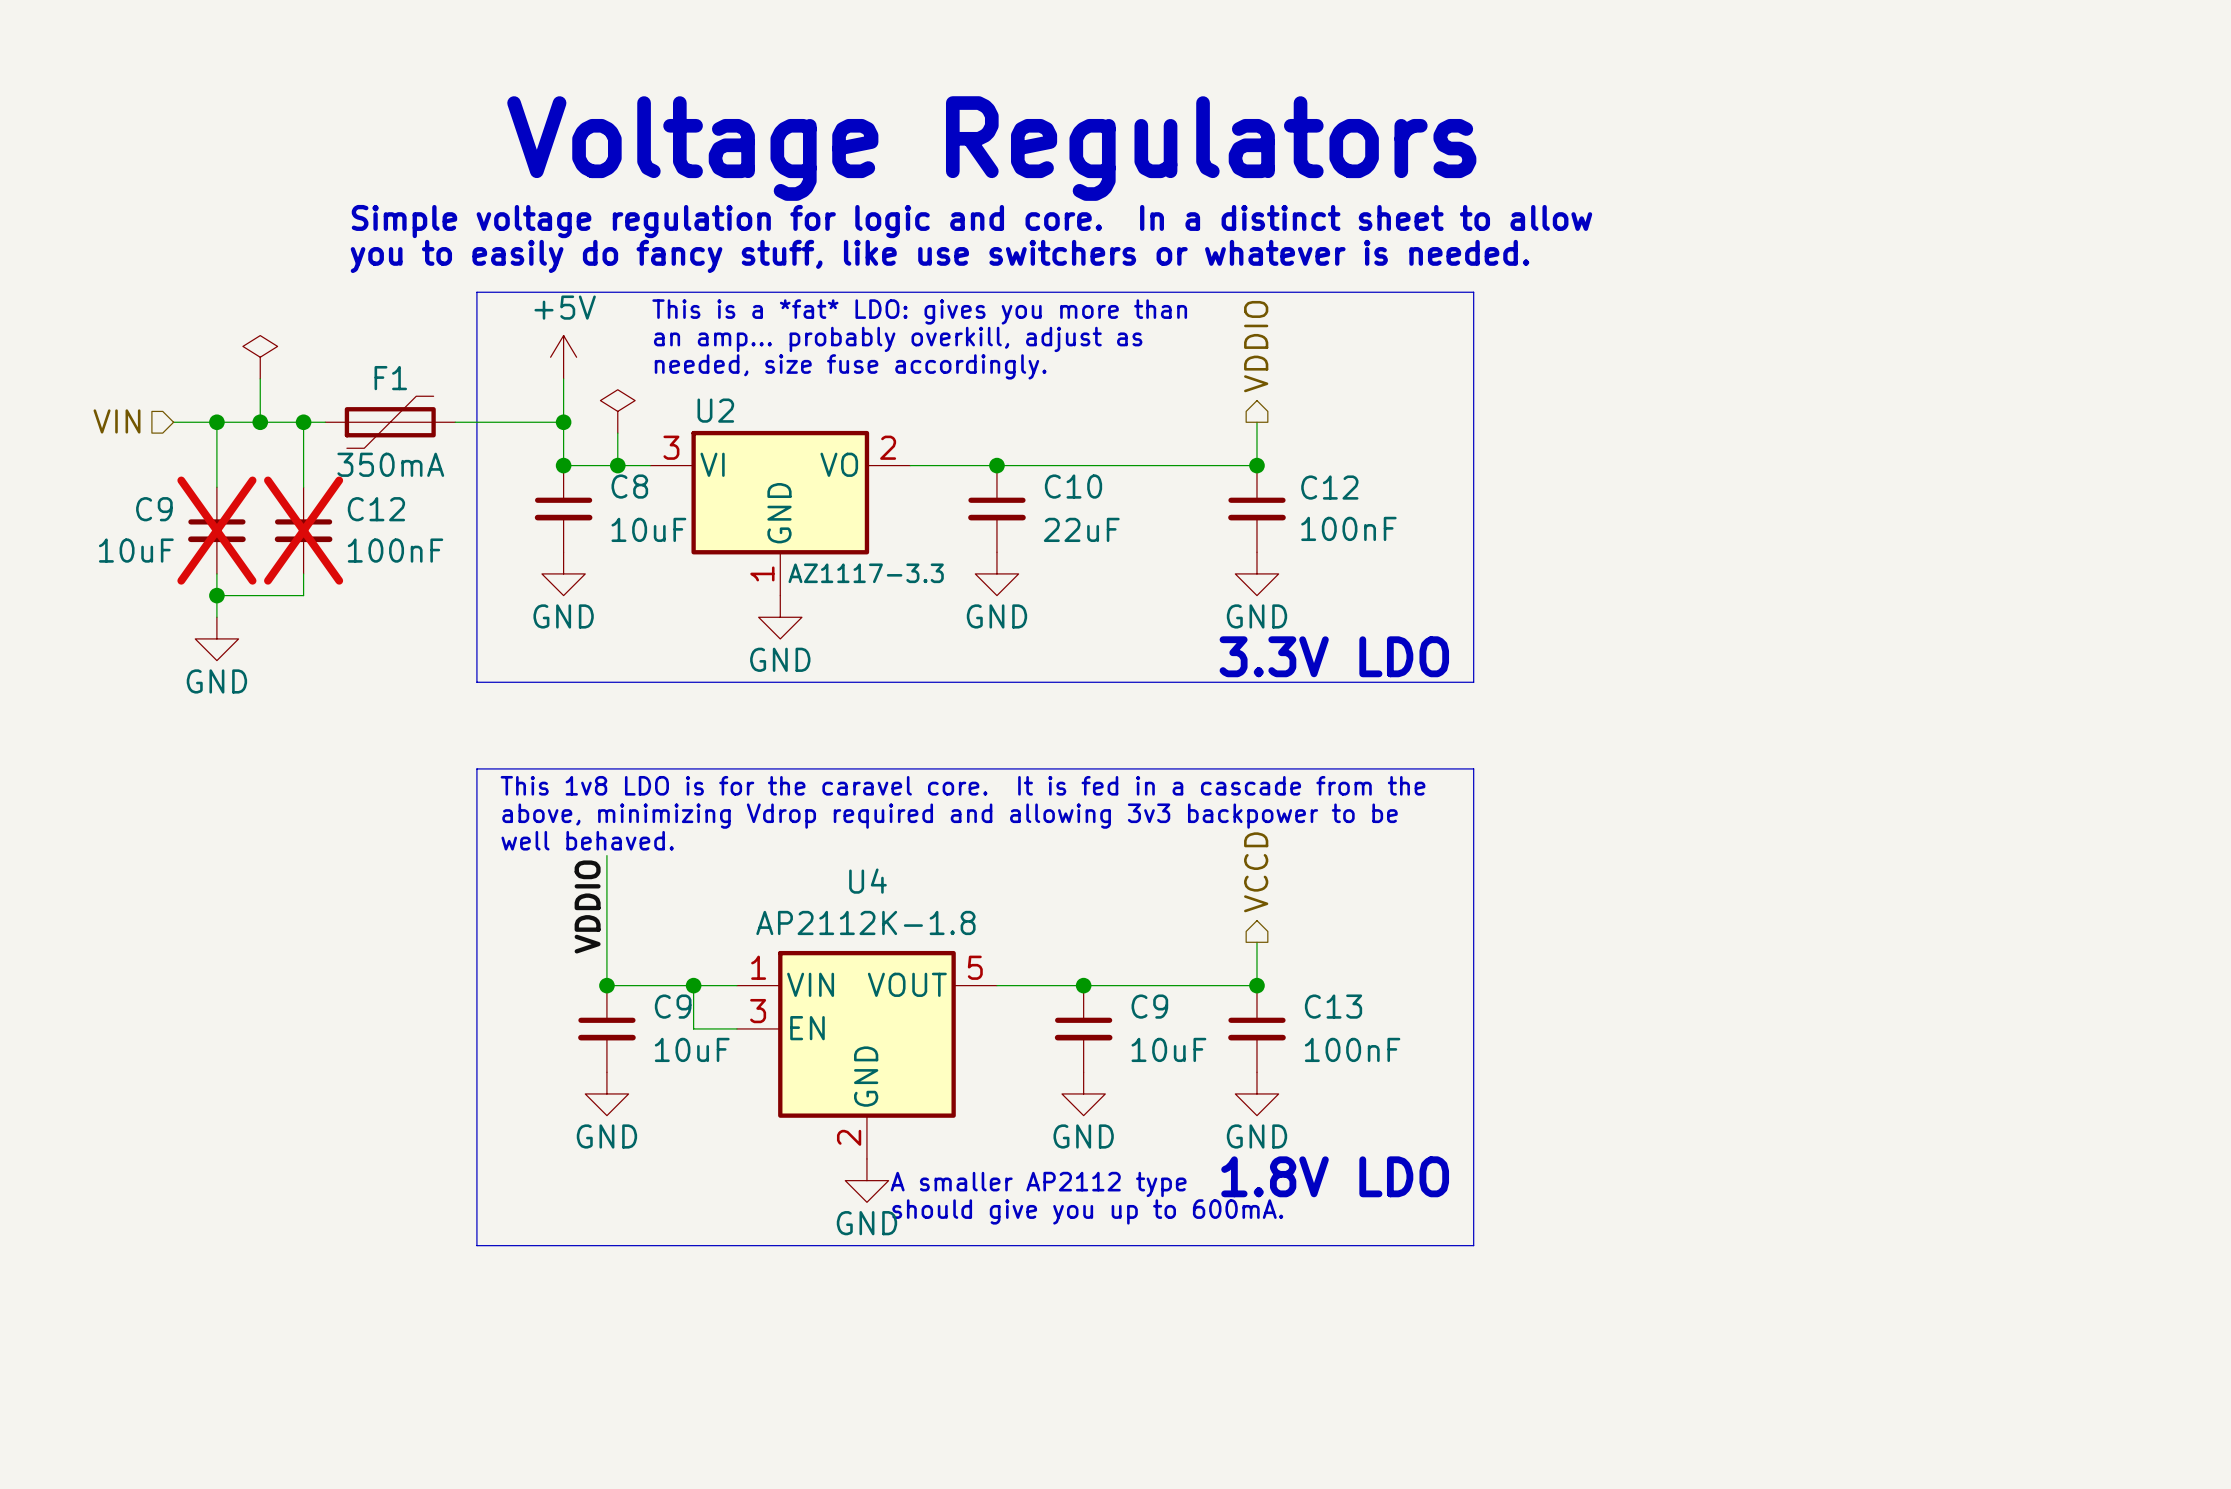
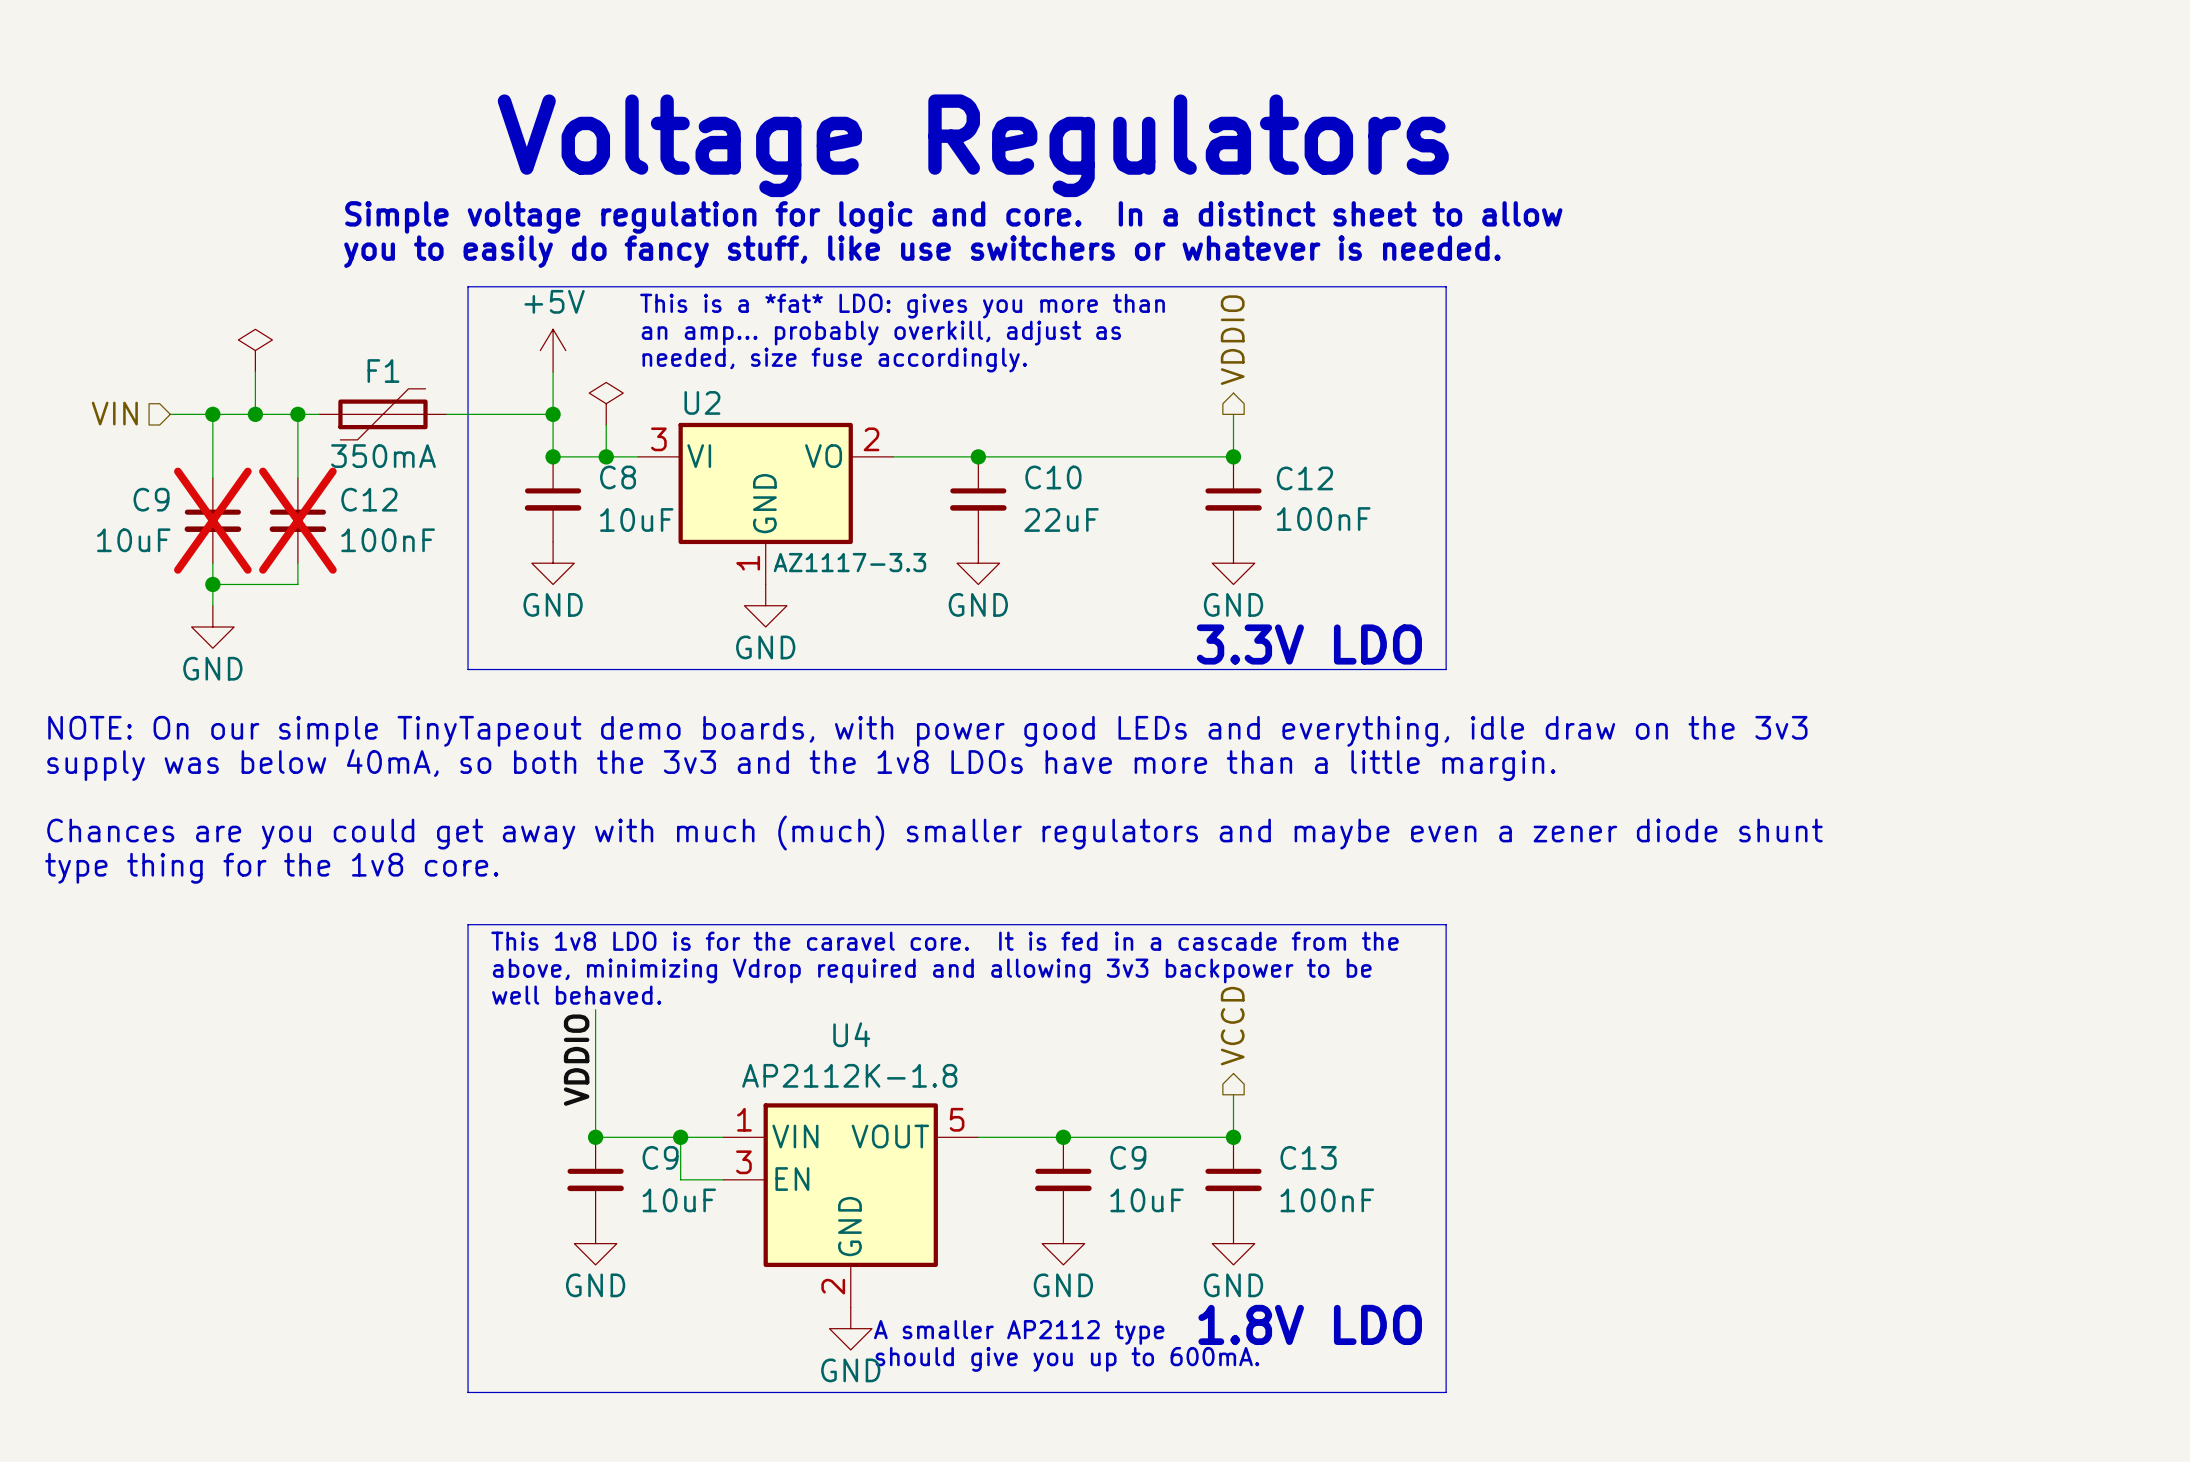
text: none -> NOTE: On our simple TinyTapeout demo boards, with power good LEDs and everything, idle draw on the 3v3 (927, 731)
text: none -> supply was below 40mA, so both the 3v3 and the 1v8 LDOs have more than a little margin. (801, 765)
text position: This 1v8 LDO is for the caravel core. It is fed in a cascade from the (963, 785) -> This 1v8 LDO is for the caravel core. It is fed in a cascade from the (945, 941)
text position: above, minimizing Vdrop required and allowing 3v3 backpower to be (950, 816) -> above, minimizing Vdrop required and allowing 3v3 backpower to be (932, 970)
text position: well behaved. (587, 840) -> well behaved. (576, 995)
text: none -> Chances are you could get away with much (much) smaller regulators and maybe even a zener diode shunt (934, 833)
wire: (606, 855) (606, 985) (736, 985) -> (595, 1009) (595, 1137) (723, 1137)
hierarchical label position: VCCD (1256, 872) -> VCCD (1232, 1026)
text: none -> type thing for the 1v8 core. (271, 868)
label position: VDDIO (587, 906) -> VDDIO (576, 1060)
line: (476, 942) (476, 768) (1473, 768) (1473, 942) -> (468, 924) (1446, 924)
wire: (1256, 942) (1256, 985) (996, 985) -> (1233, 1094) (1233, 1137) (978, 1137)
junction: (606, 985) -> none
wire: (693, 985) (693, 1028) (736, 1028) -> (680, 1137) (680, 1179) (723, 1179)
junction: (693, 985) -> none
junction: (1083, 985) -> none
junction: (1256, 985) -> none
C9 position: (606, 1028) -> (595, 1179)
C9 position: (1083, 1028) -> (1063, 1179)
C13 position: (1256, 1028) -> (1233, 1179)
U4 position: (866, 1054) -> (850, 1205)
power symbol: GND (606, 1093) -> none
power symbol: GND (1083, 1093) -> none
power symbol: GND (1256, 1093) -> none
junction: none -> (595, 1137)
junction: none -> (680, 1137)
junction: none -> (1063, 1137)
junction: none -> (1233, 1137)
text position: 1.8V LDO (1335, 1176) -> 1.8V LDO (1310, 1324)
power symbol: GND (866, 1180) -> none
text position: A smaller AP2112 type (1038, 1184) -> A smaller AP2112 type (1019, 1332)
text position: should give you up to 600mA. (1087, 1211) -> should give you up to 600mA. (1067, 1359)
line: (476, 1245) (1473, 1245) -> (468, 1222) (468, 1392) (1446, 1392) (1446, 1222)
power symbol: none -> GND (595, 1243)
power symbol: none -> GND (1063, 1243)
power symbol: none -> GND (1233, 1243)
power symbol: none -> GND (850, 1328)

